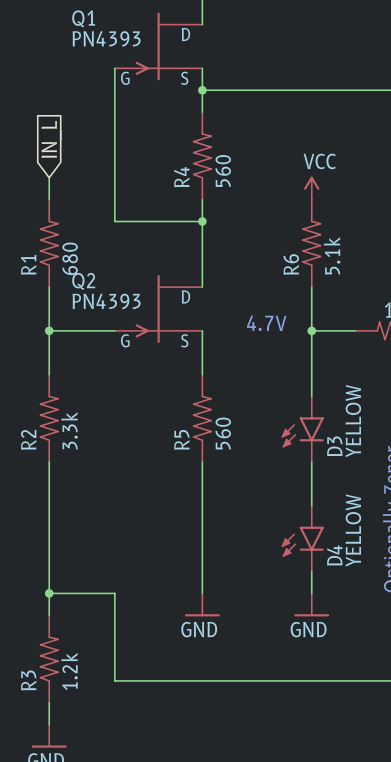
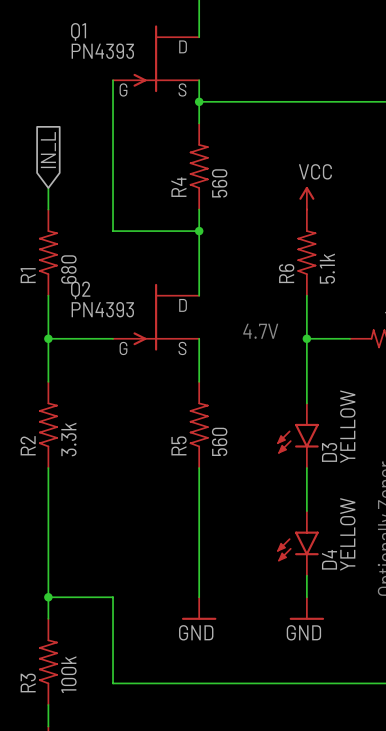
R3 value: 1.2k (69, 671) -> 100k (68, 674)

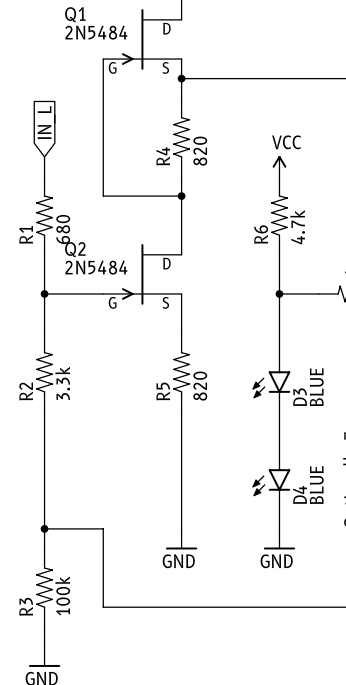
Q1 value: PN4393 (102, 51) -> 2N5484 (96, 32)
R4 value: 560 (219, 183) -> 820 (200, 151)
R6 value: 5.1k (327, 268) -> 4.7k (297, 227)
Q2 value: PN4393 (102, 309) -> 2N5484 (96, 267)
text: 4.7V (260, 331) -> none
D3 value: YELLOW (347, 426) -> BLUE (316, 387)
R5 value: 560 (219, 441) -> 820 (200, 386)
D4 value: YELLOW (347, 534) -> BLUE (316, 485)

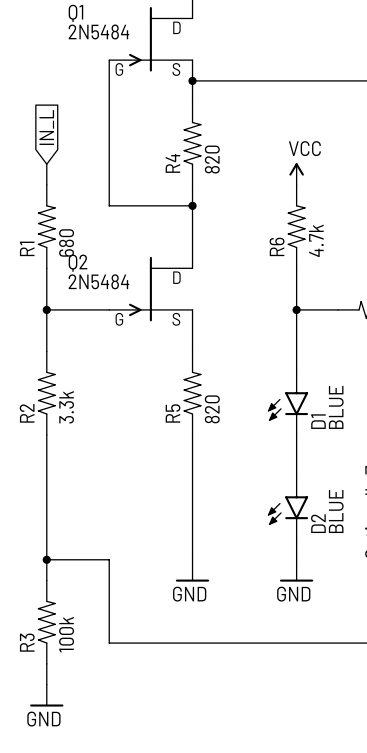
D3 name: D3 (300, 397) -> D1 (318, 421)
D4 name: D4 (300, 494) -> D2 (318, 523)

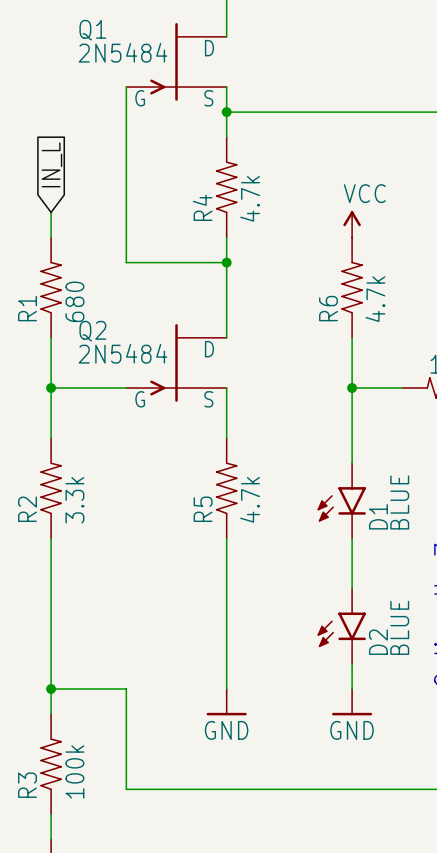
R4 value: 820 (212, 159) -> 4.7k (250, 198)
R5 value: 820 (212, 409) -> 4.7k (250, 499)

